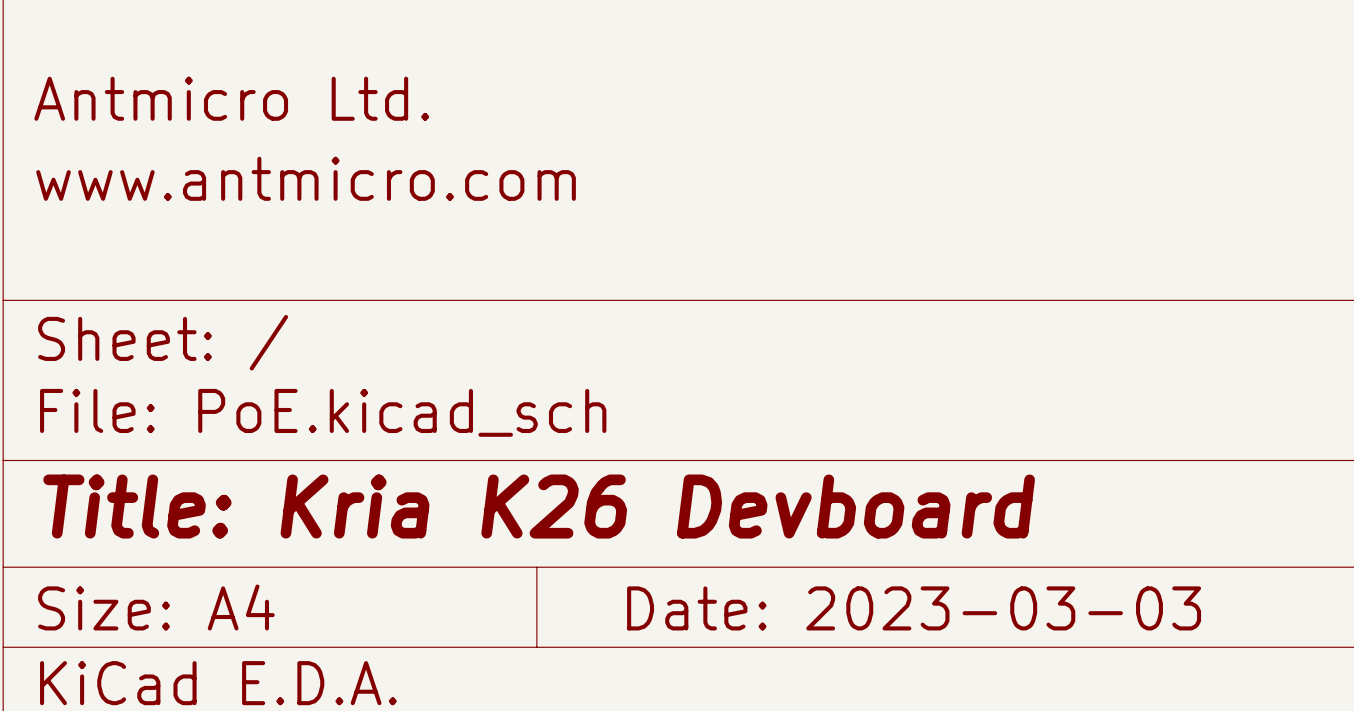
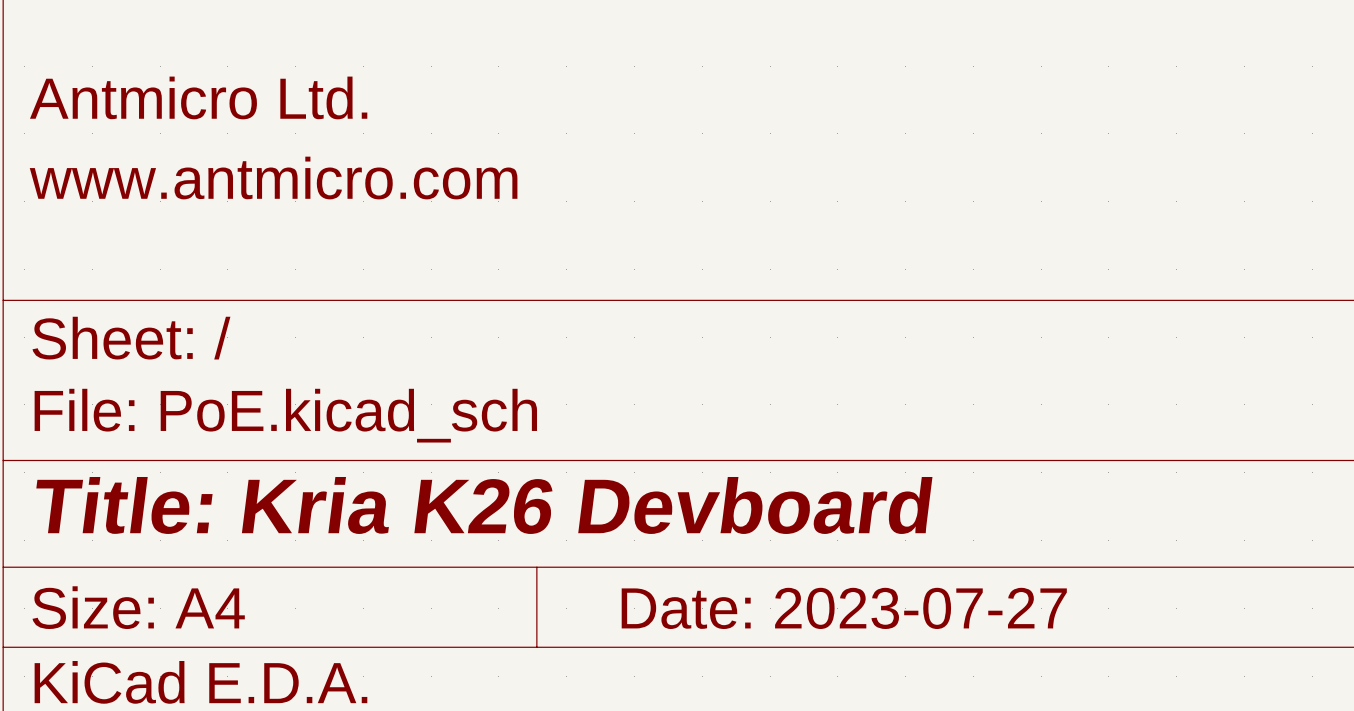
title block: Date: 2023-03-03 (914, 608) -> Date: 2023-07-27 (844, 608)

